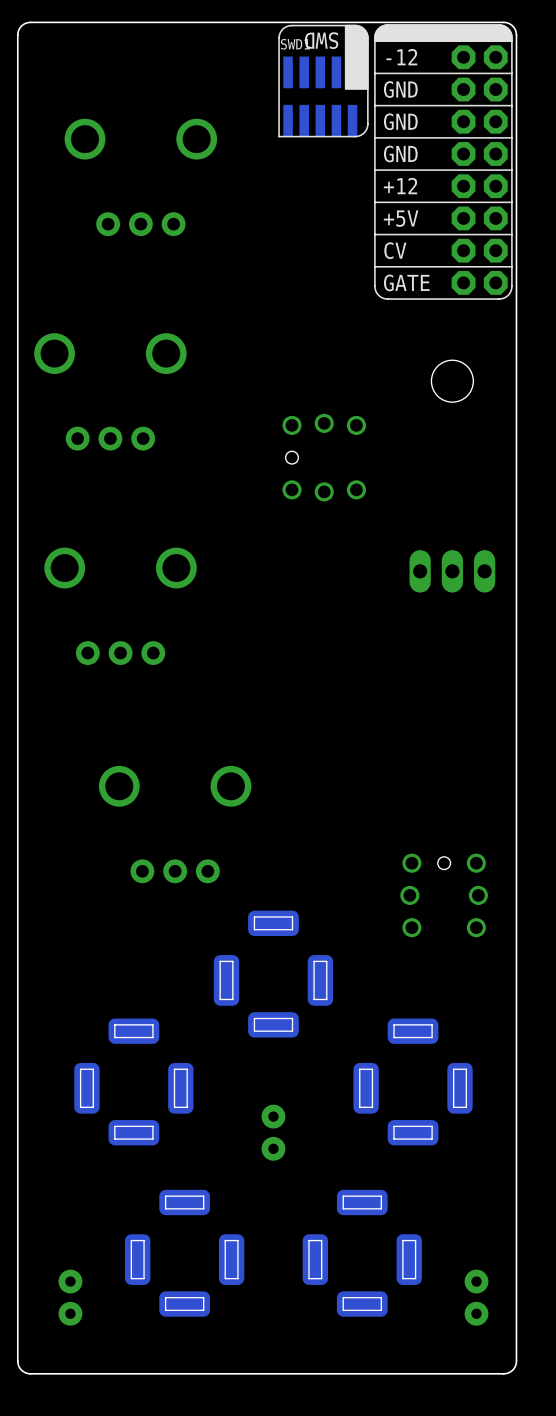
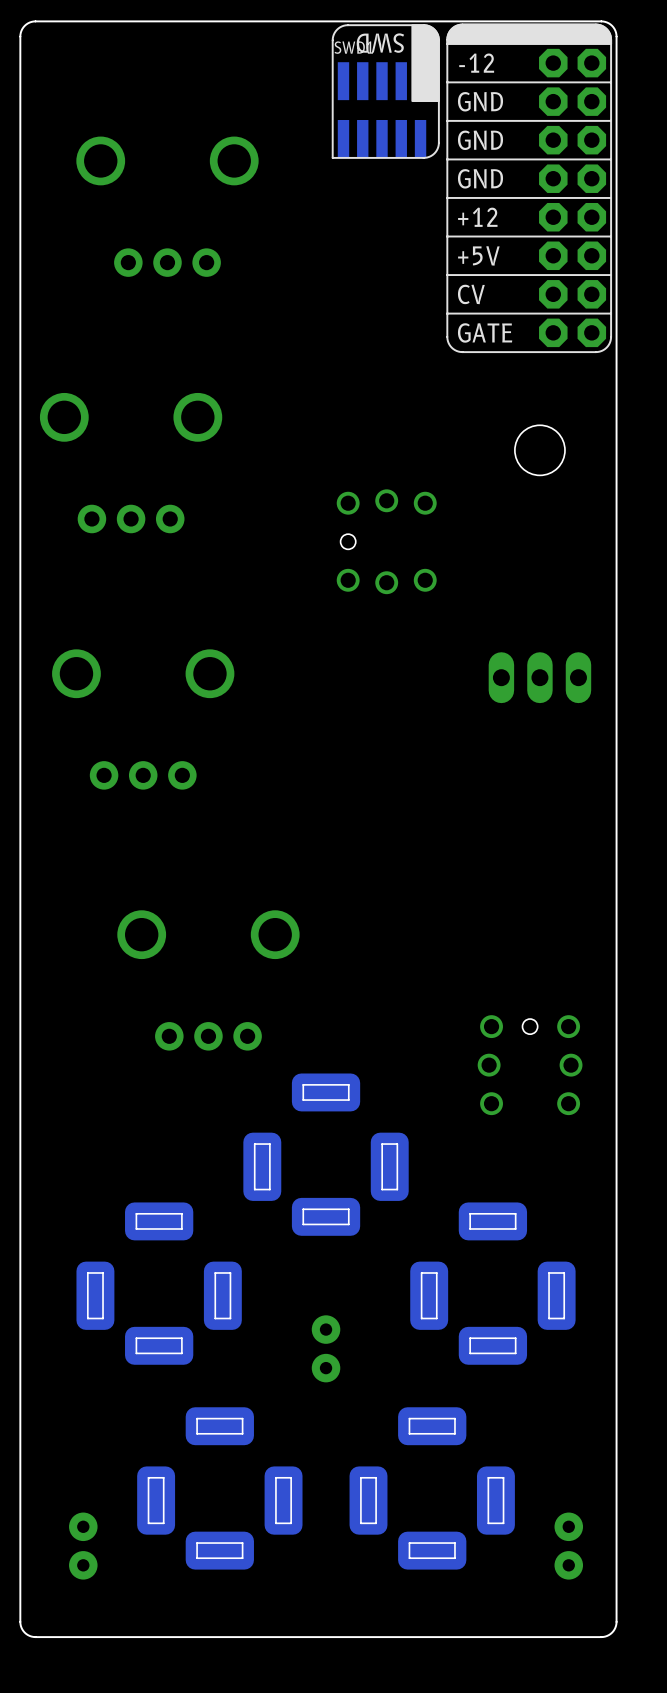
part footprint: [213, 910, 334, 1038] -> [243, 1073, 409, 1236]
part footprint: [74, 1018, 194, 1146] -> [76, 1202, 242, 1365]
part footprint: [353, 1018, 473, 1146] -> [410, 1202, 576, 1365]
part footprint: [125, 1189, 245, 1317] -> [137, 1407, 303, 1570]
part footprint: [302, 1189, 422, 1317] -> [349, 1407, 515, 1570]

